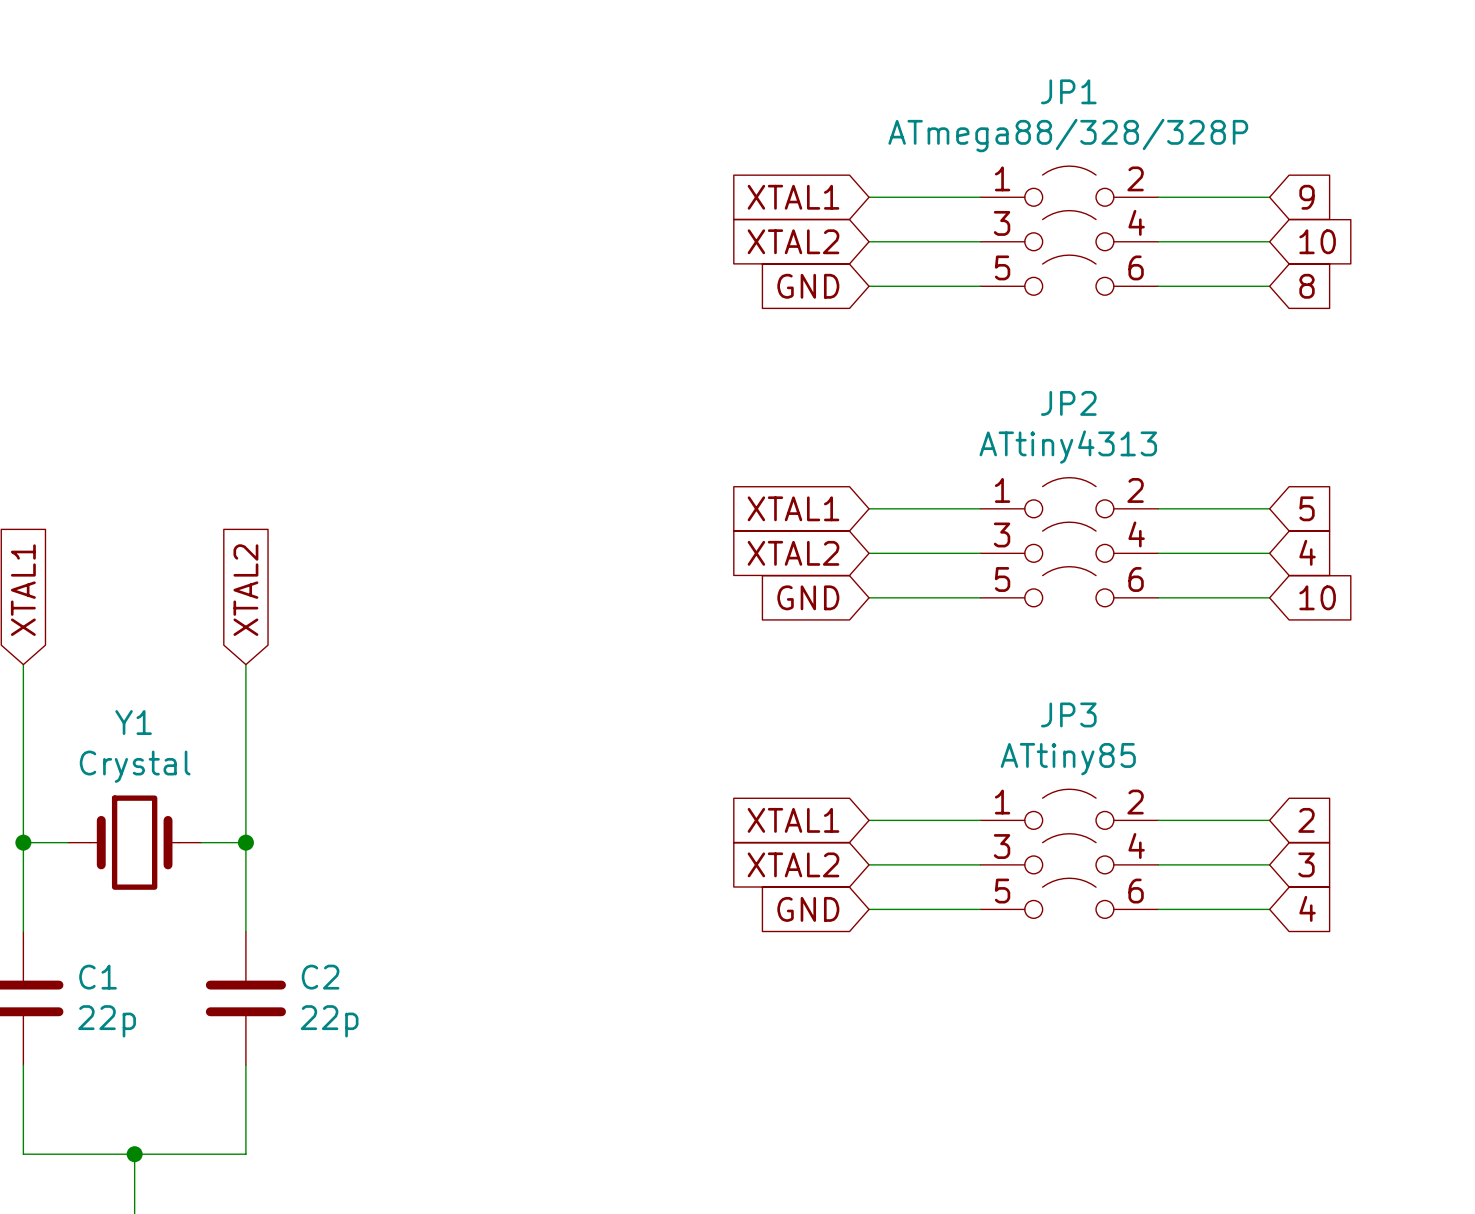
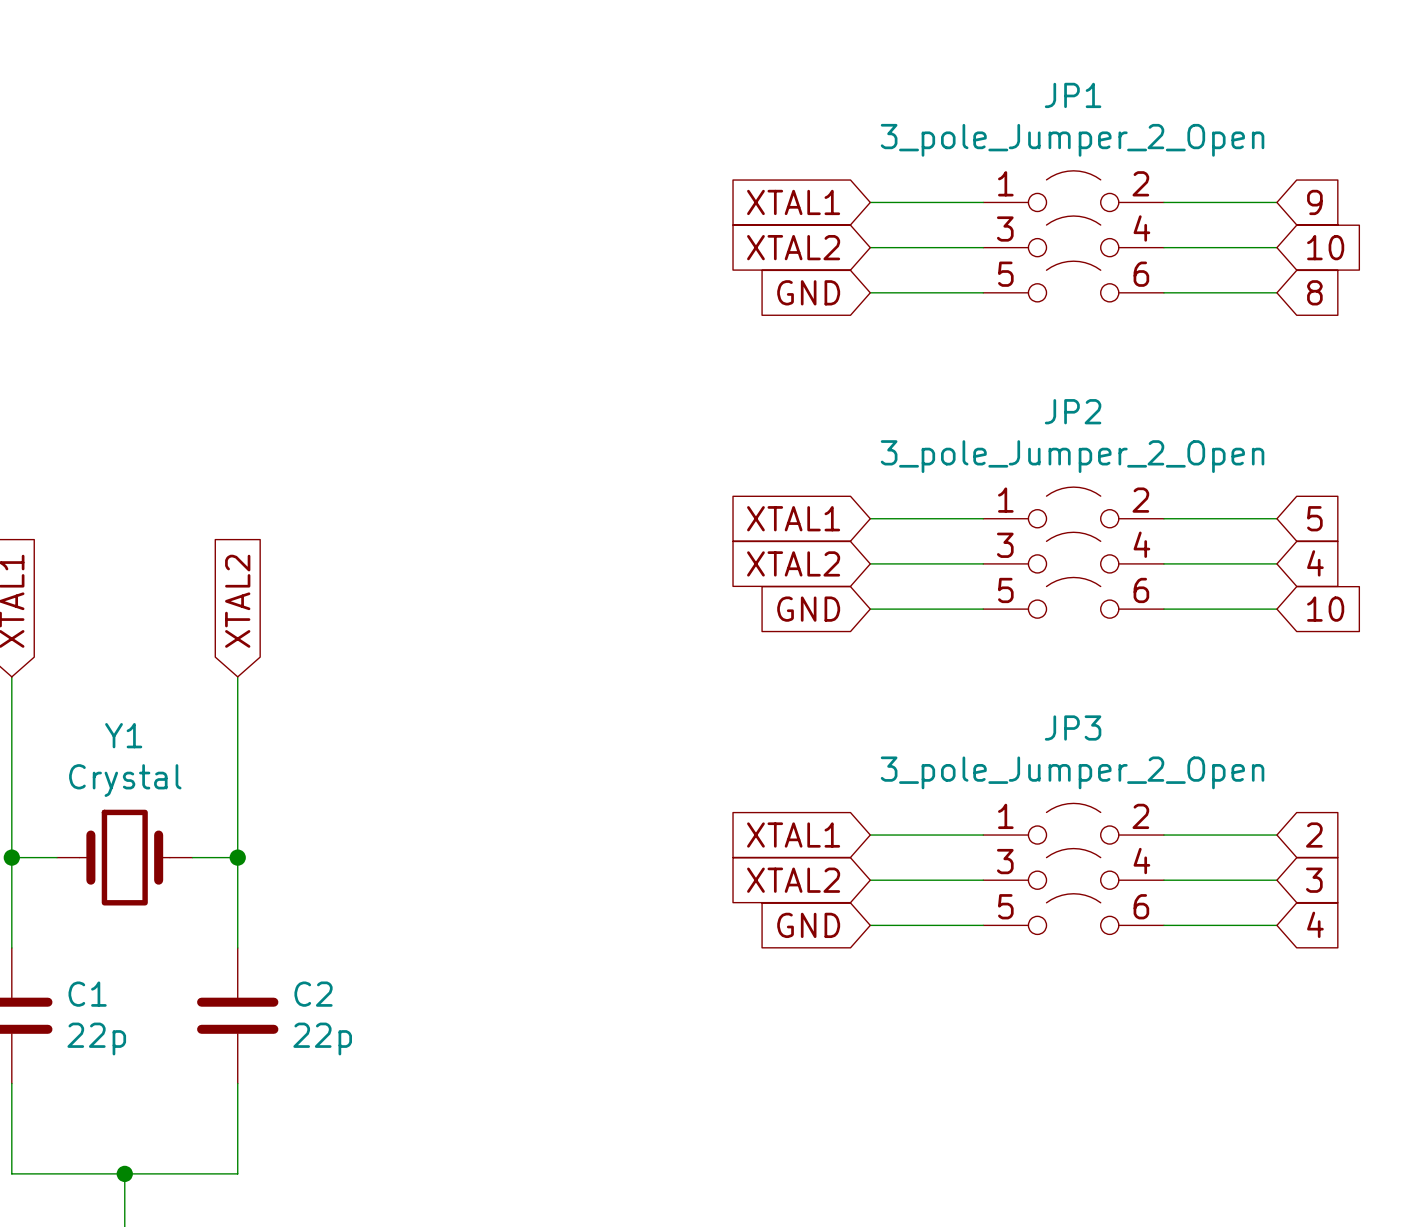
JP1 value: ATmega88/328/328P (1068, 135) -> 3_pole_Jumper_2_Open (1072, 140)
JP2 value: ATtiny4313 (1068, 447) -> 3_pole_Jumper_2_Open (1072, 456)
JP3 value: ATtiny85 (1068, 759) -> 3_pole_Jumper_2_Open (1072, 772)

